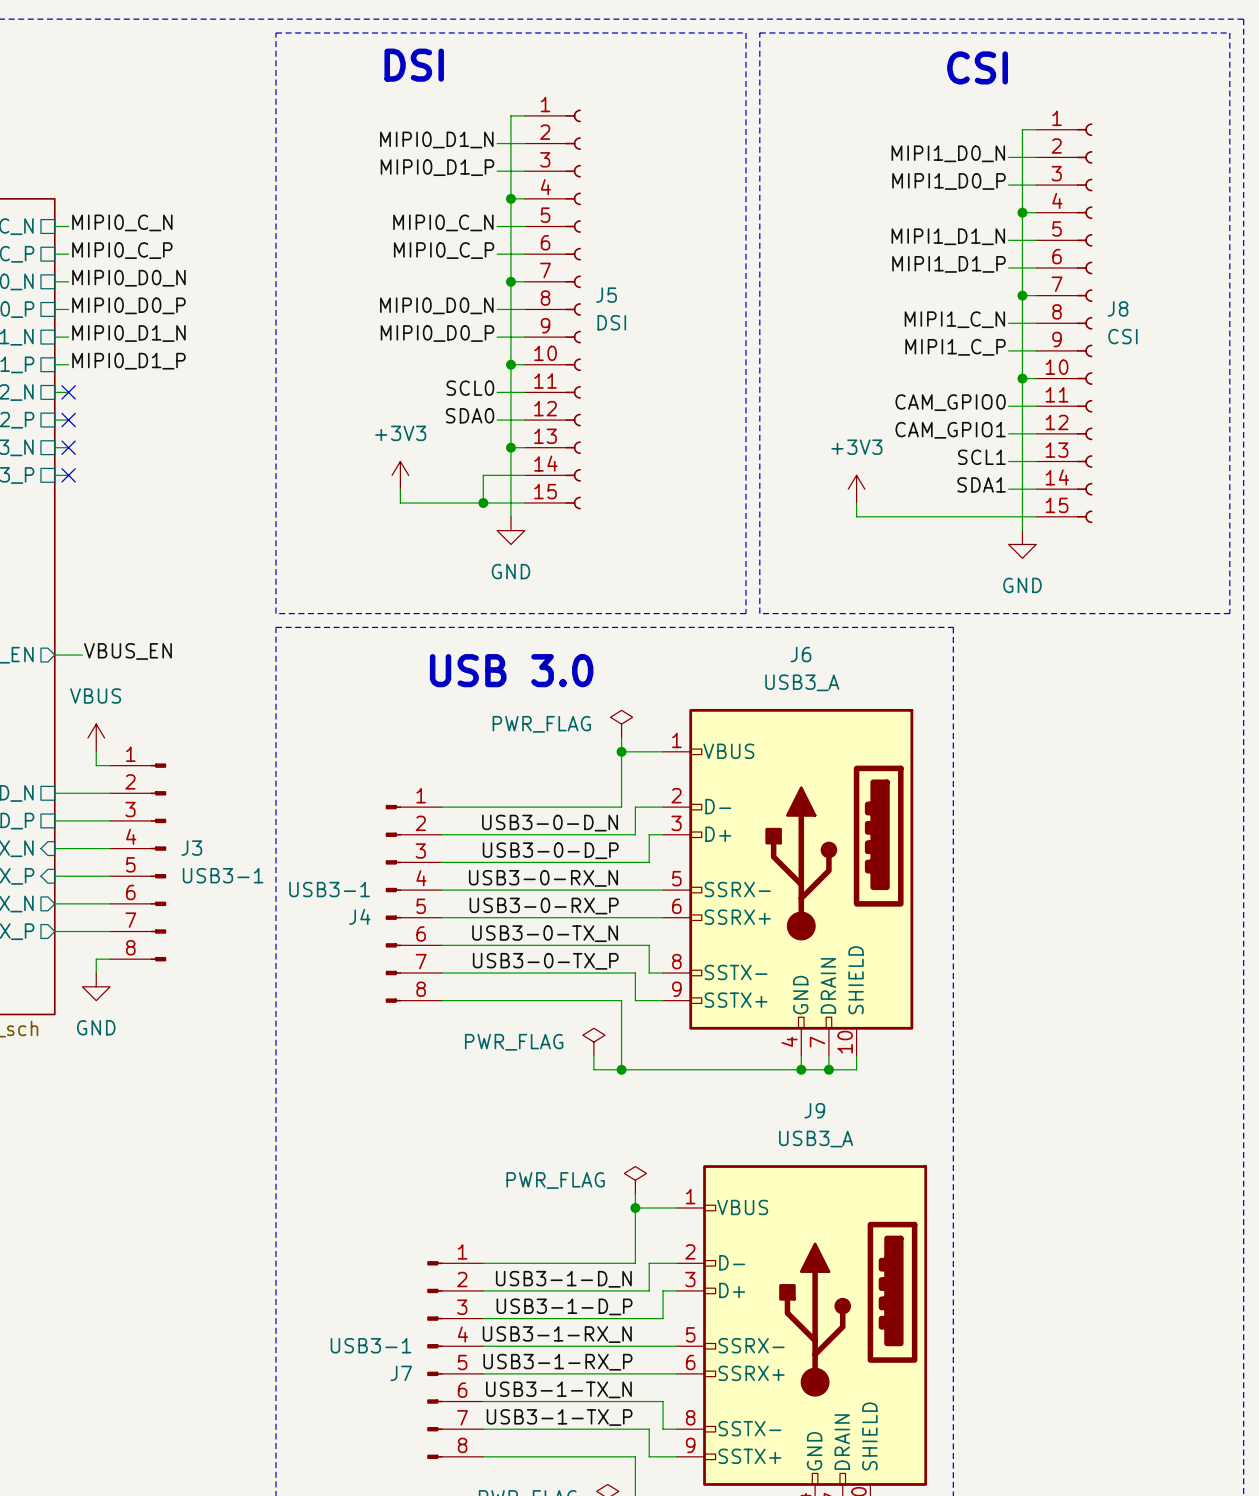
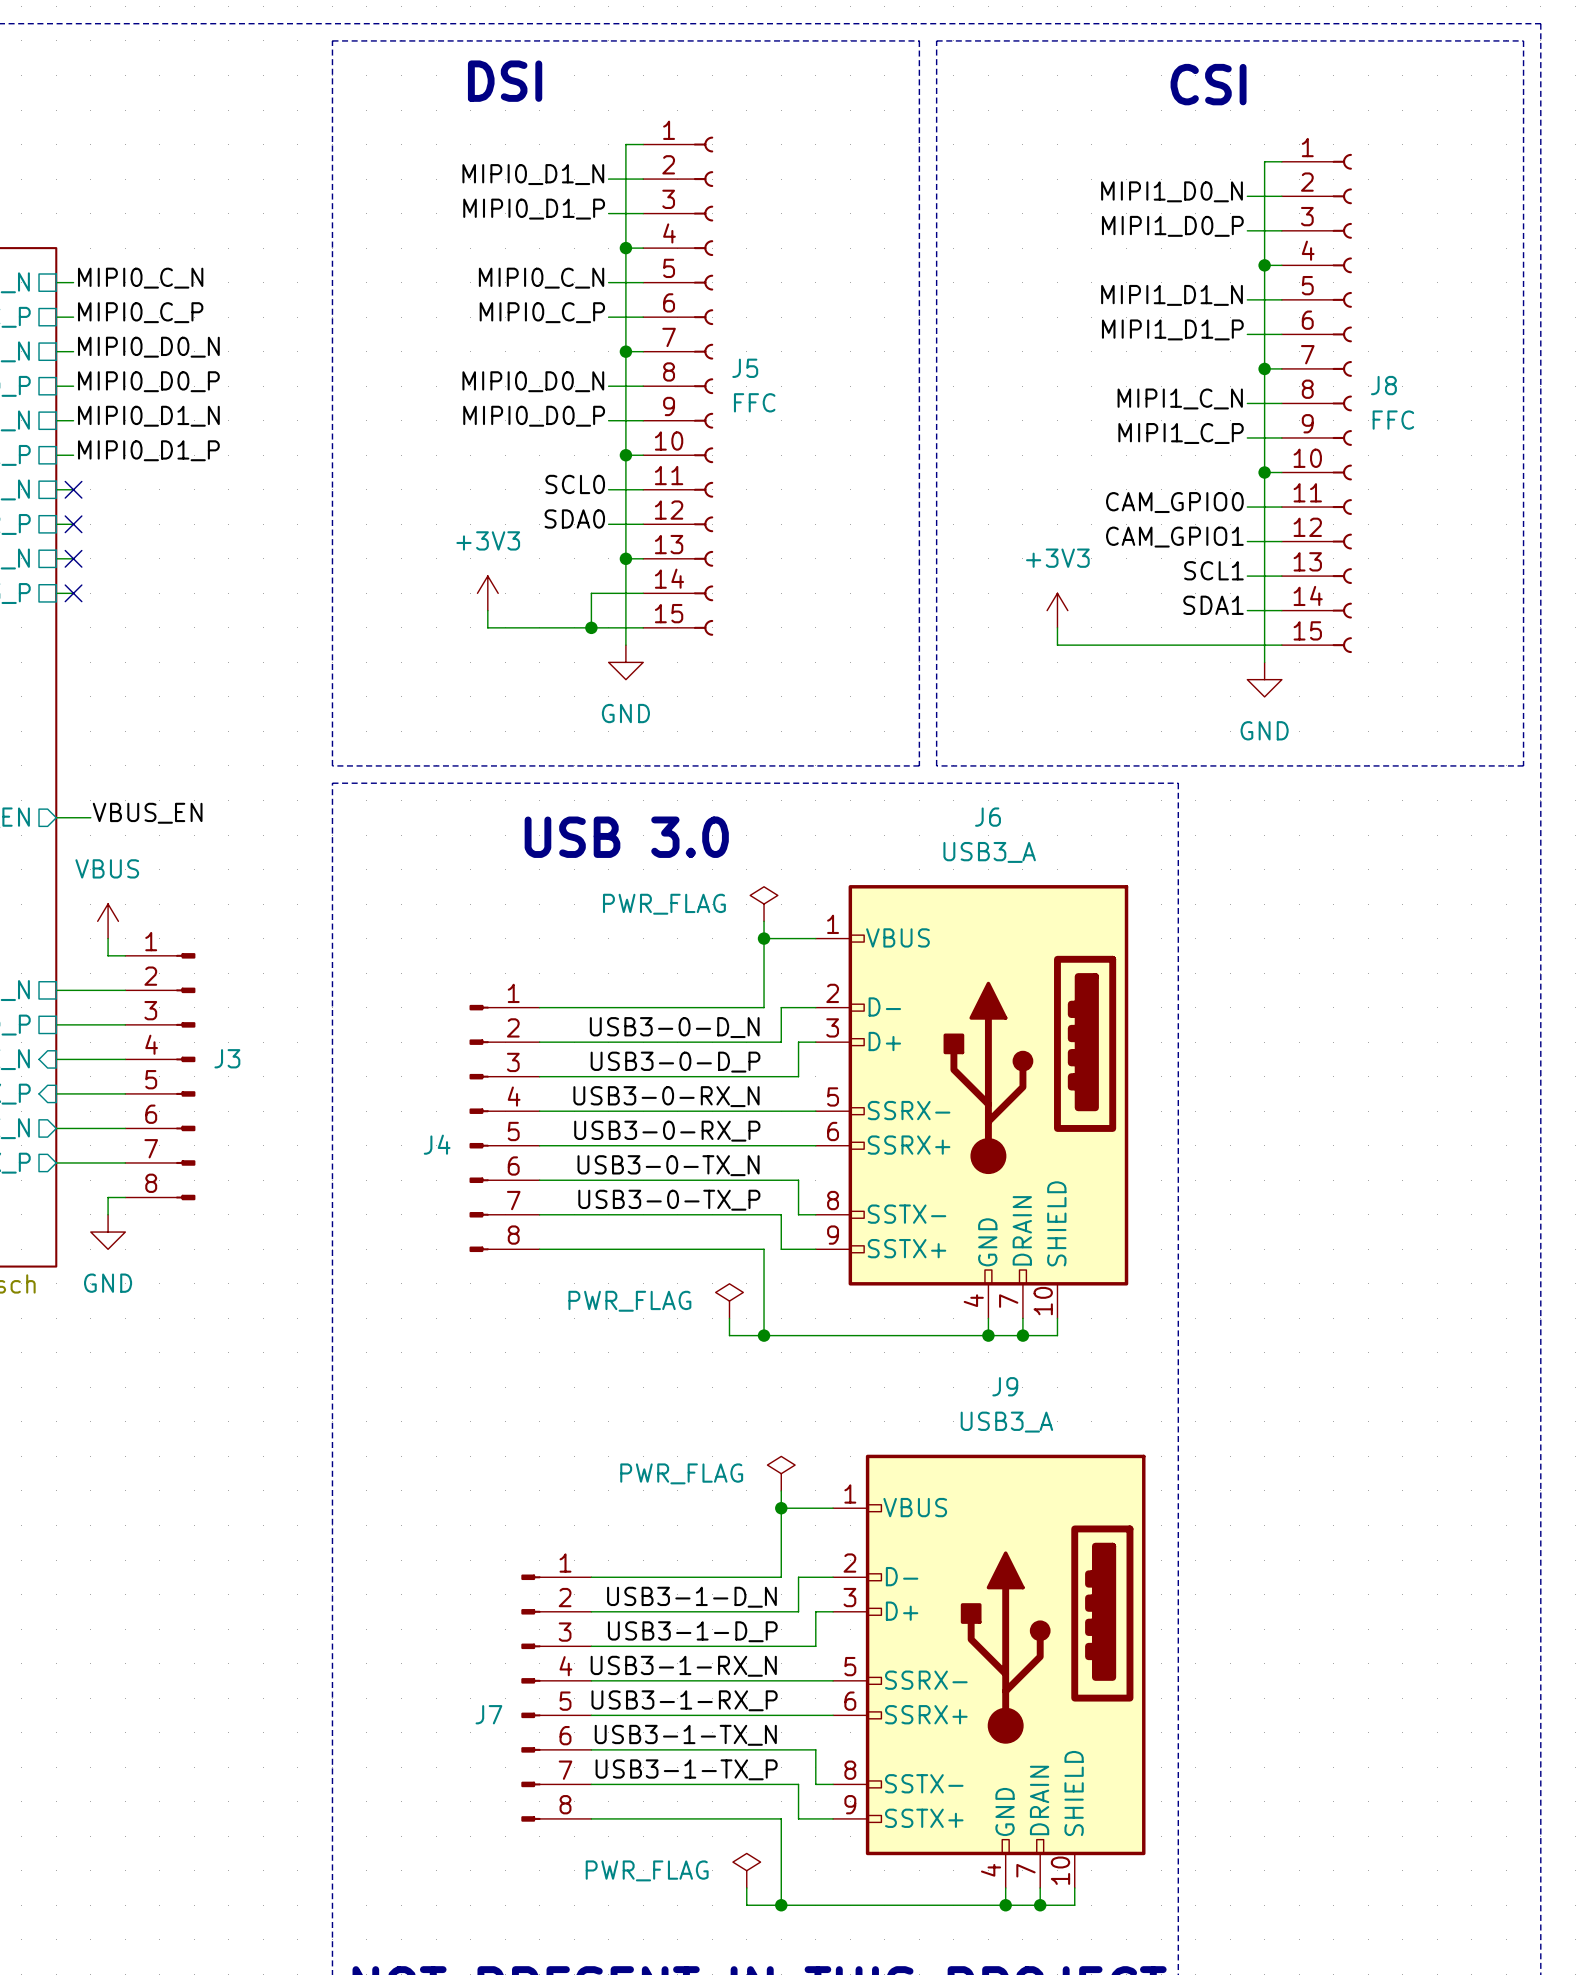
J5 value: DSI (611, 322) -> FFC (754, 402)
J8 value: CSI (1122, 336) -> FFC (1393, 420)
J3 value: USB3-1 (223, 875) -> none
J4 value: USB3-1 (329, 889) -> none
J7 value: USB3-1 (370, 1345) -> none

